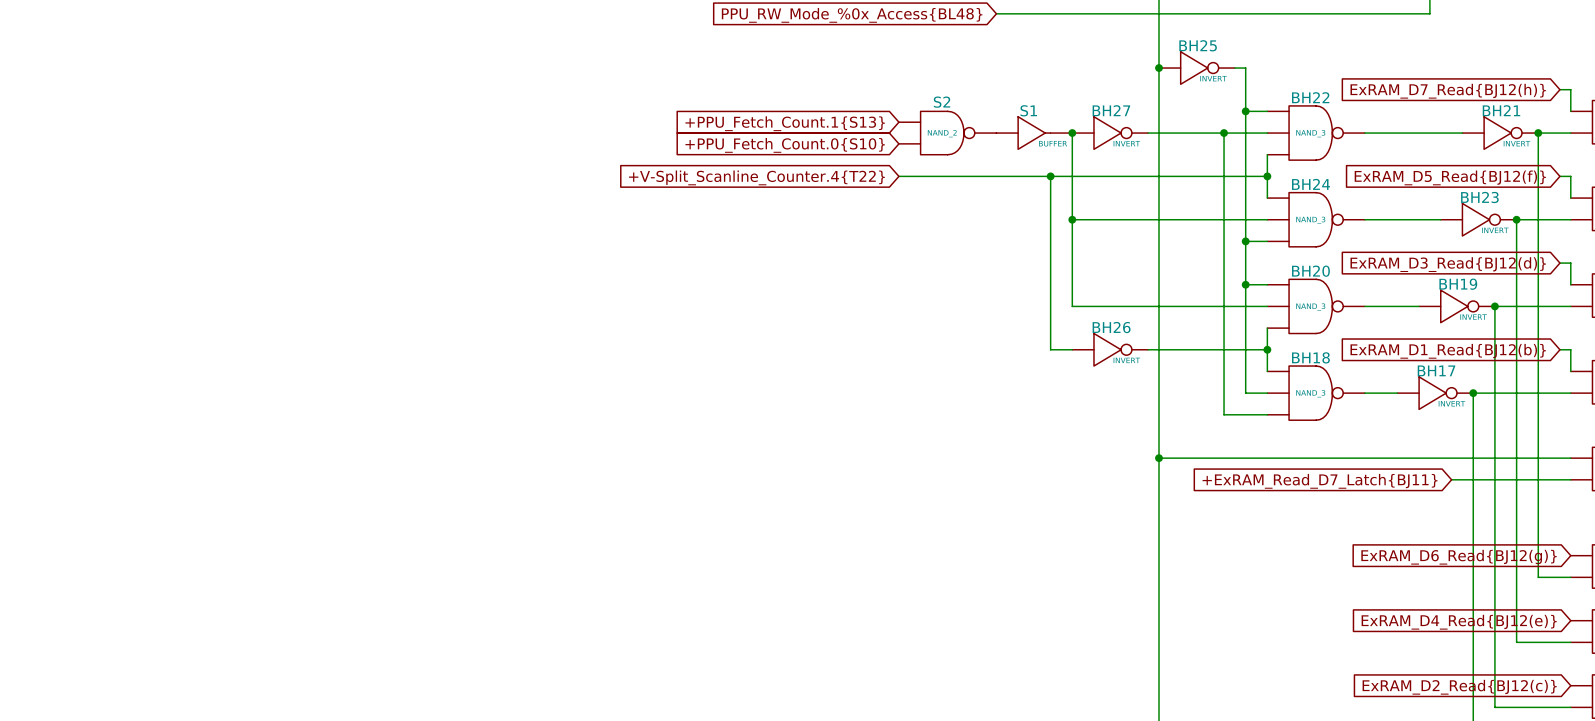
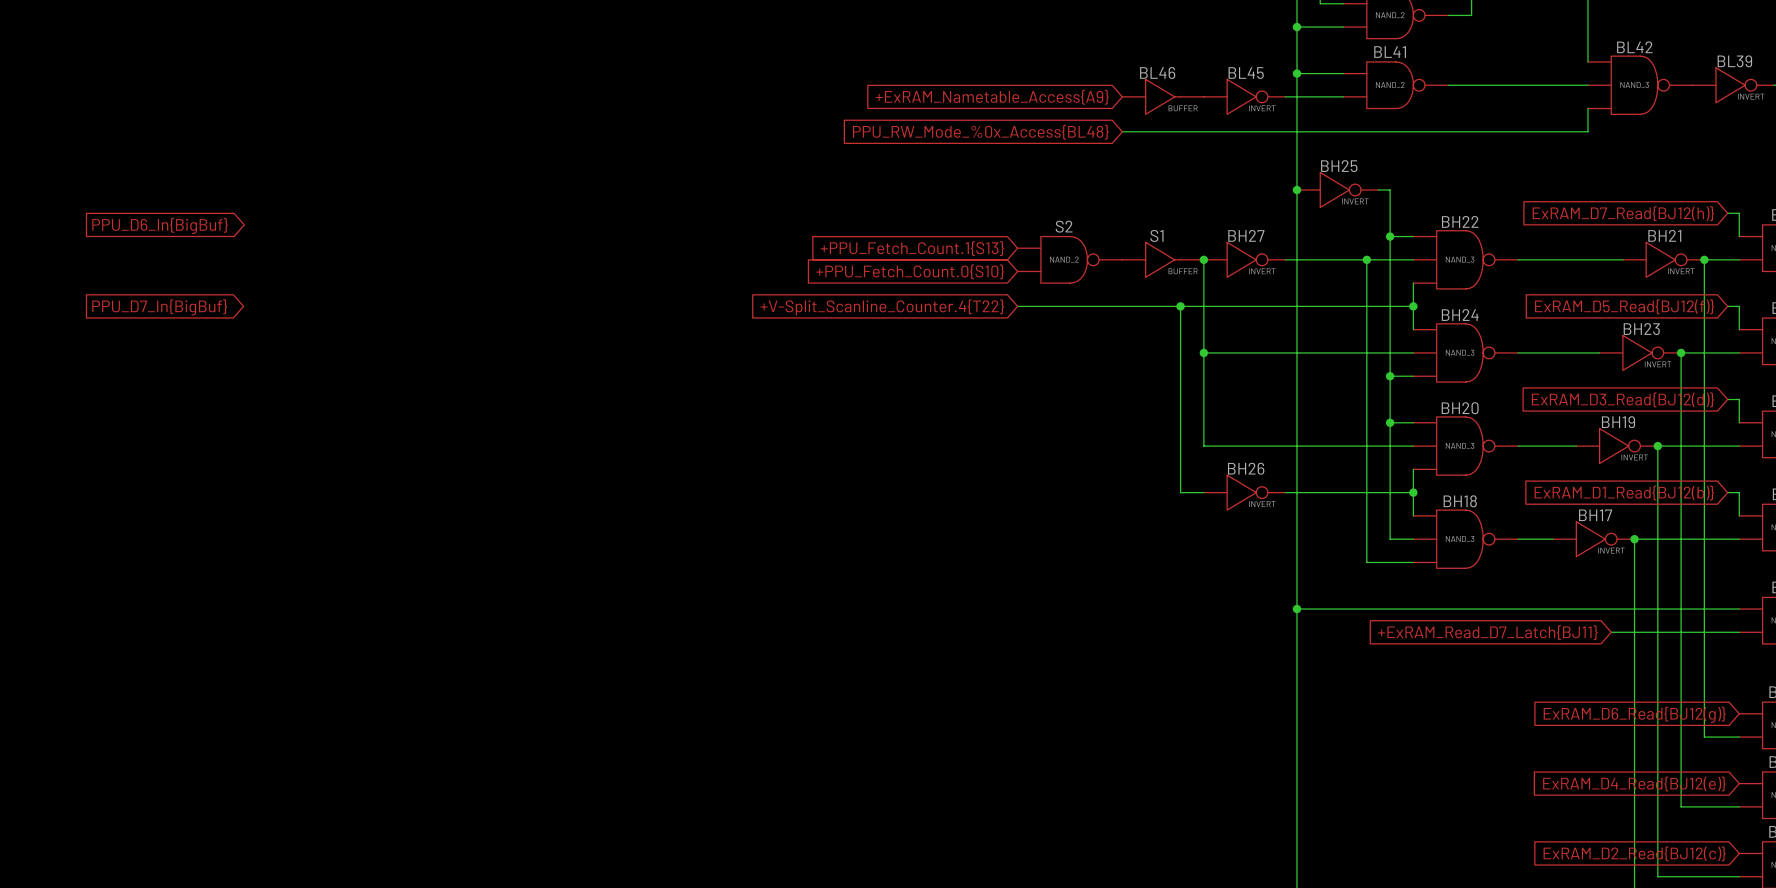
global label: none -> PPU_D6_In{BigBuf} (160, 225)
global label: none -> PPU_D7_In{BigBuf} (159, 307)

